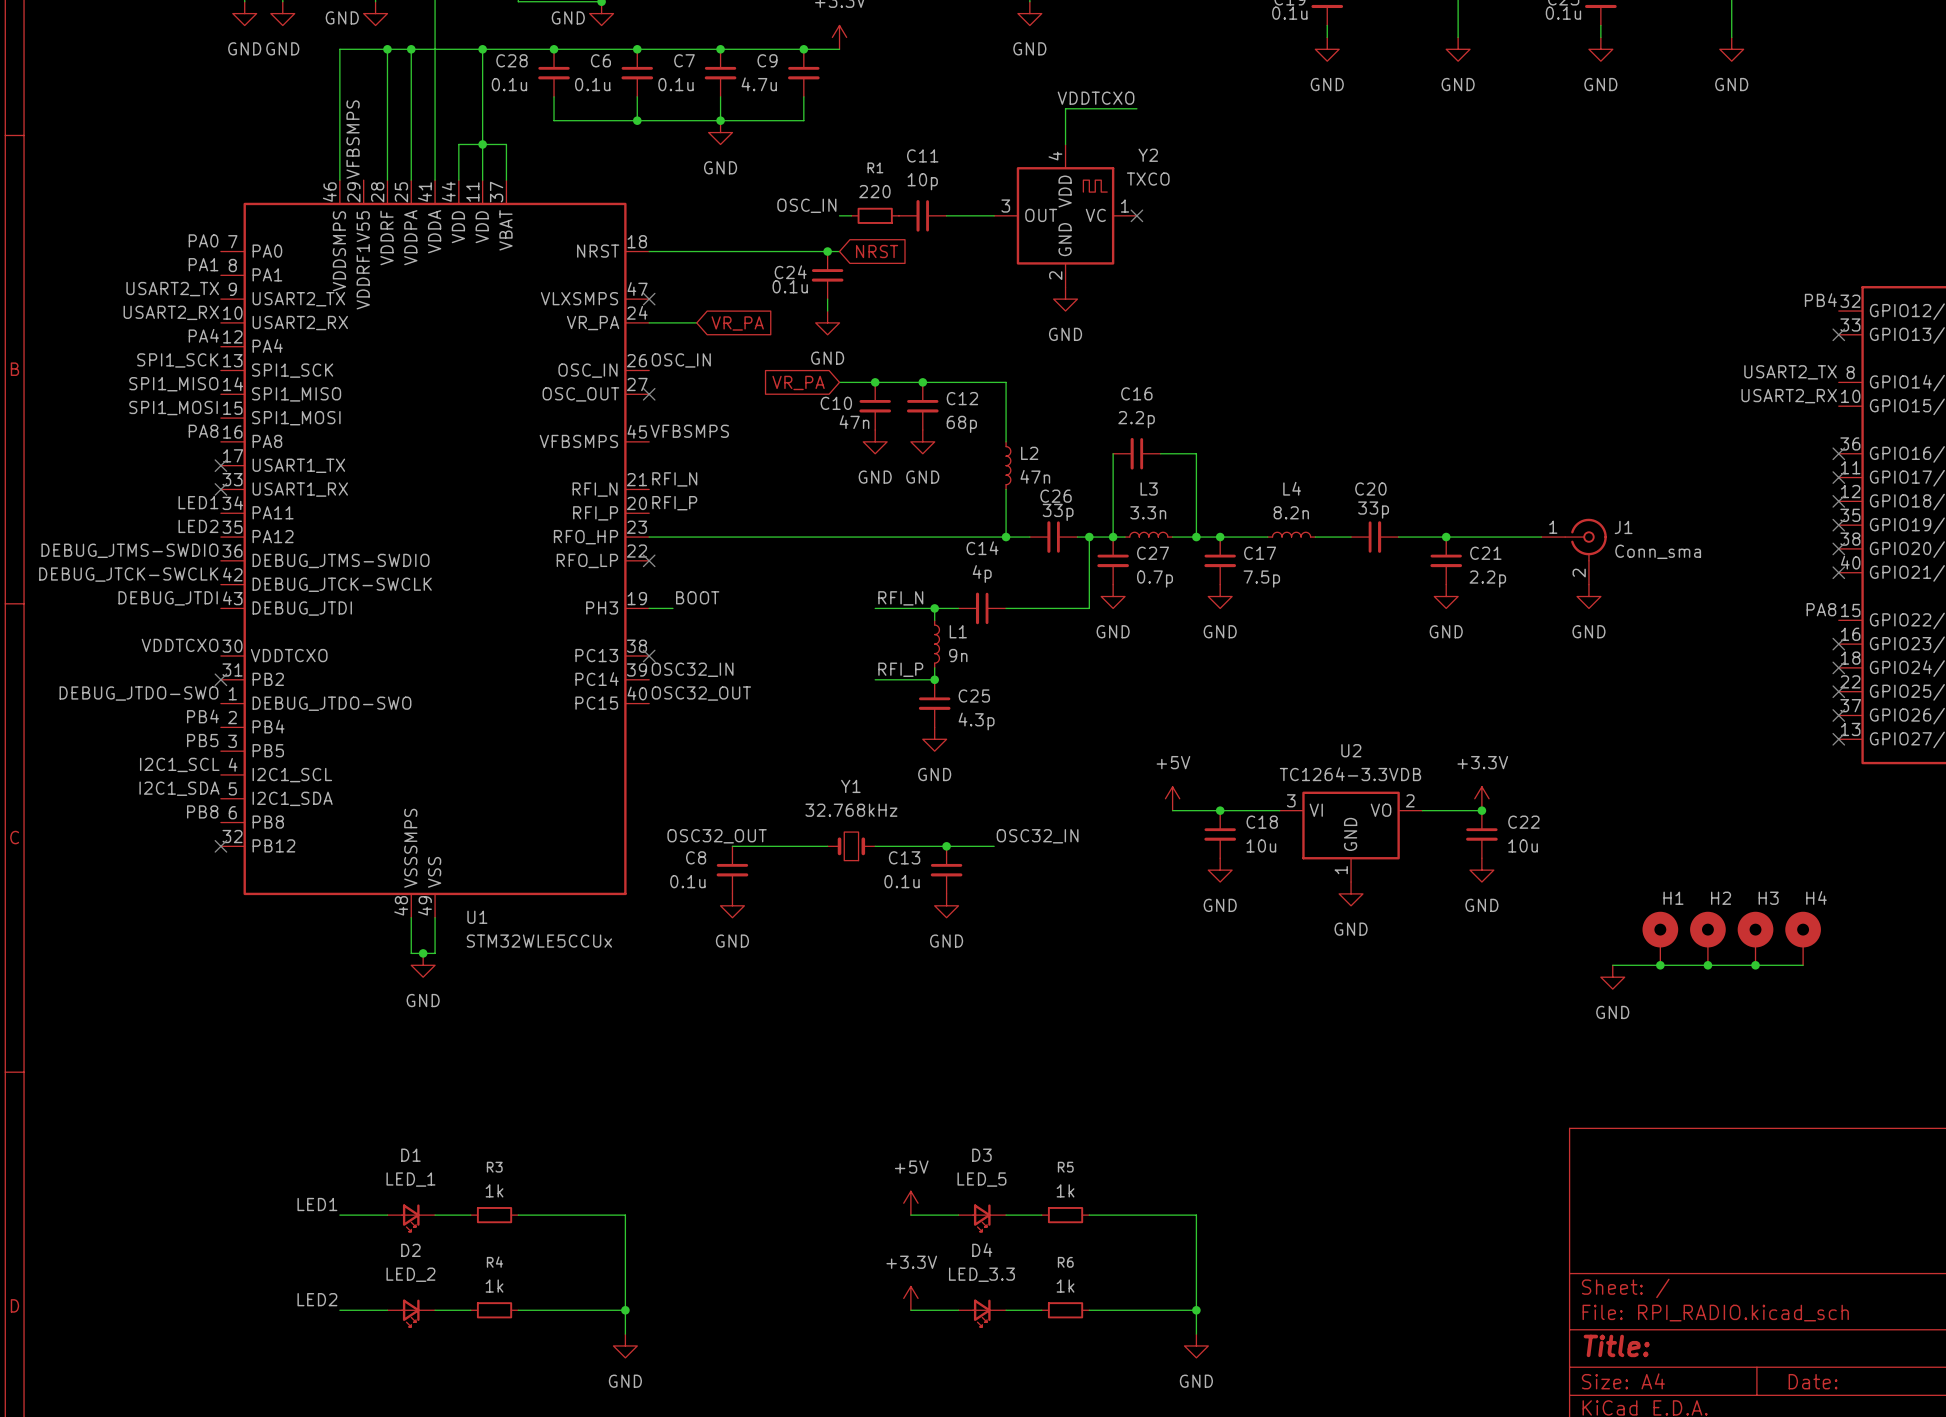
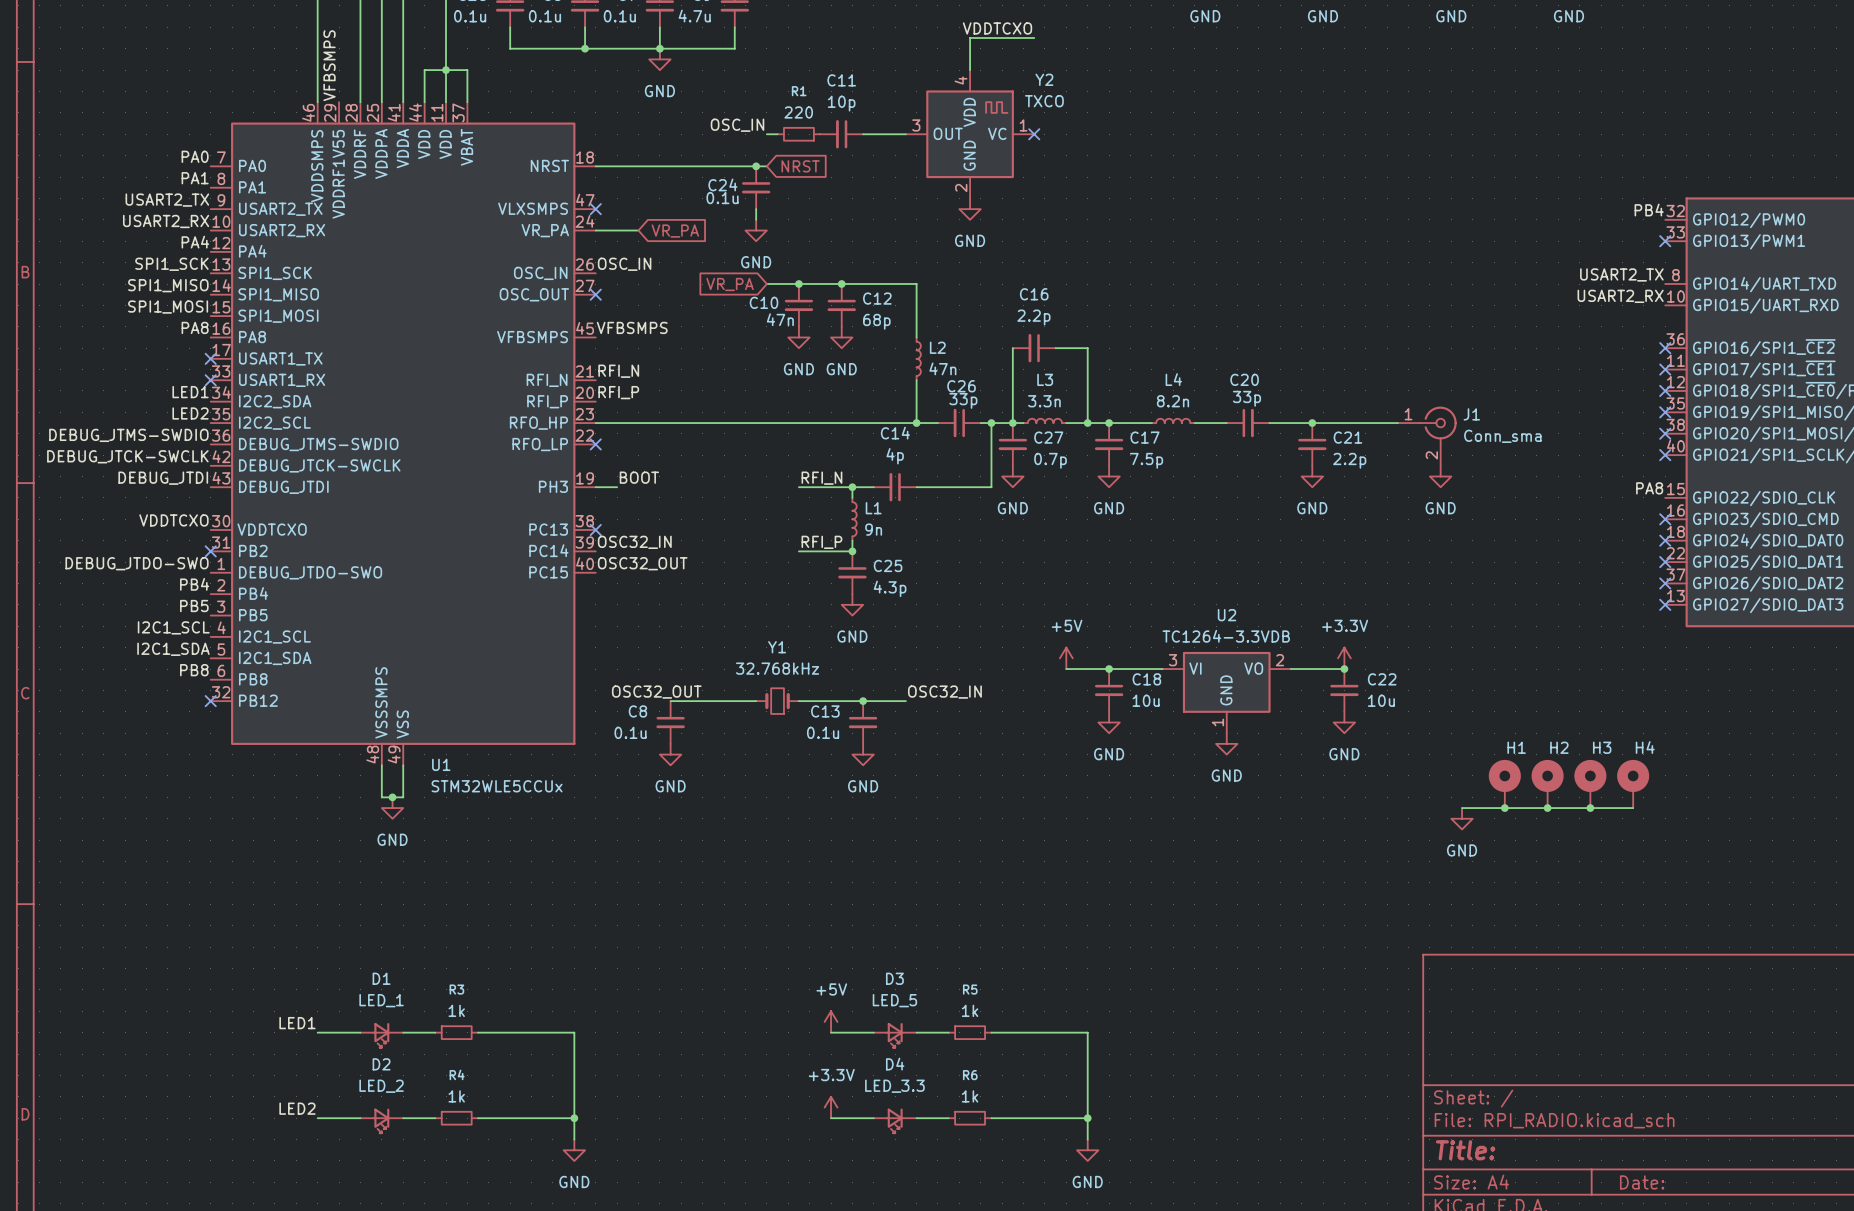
U1 pin name: PA11 (273, 512) -> I2C2_SDA (275, 401)
U1 pin name: PA12 (273, 536) -> I2C2_SCL (274, 423)

